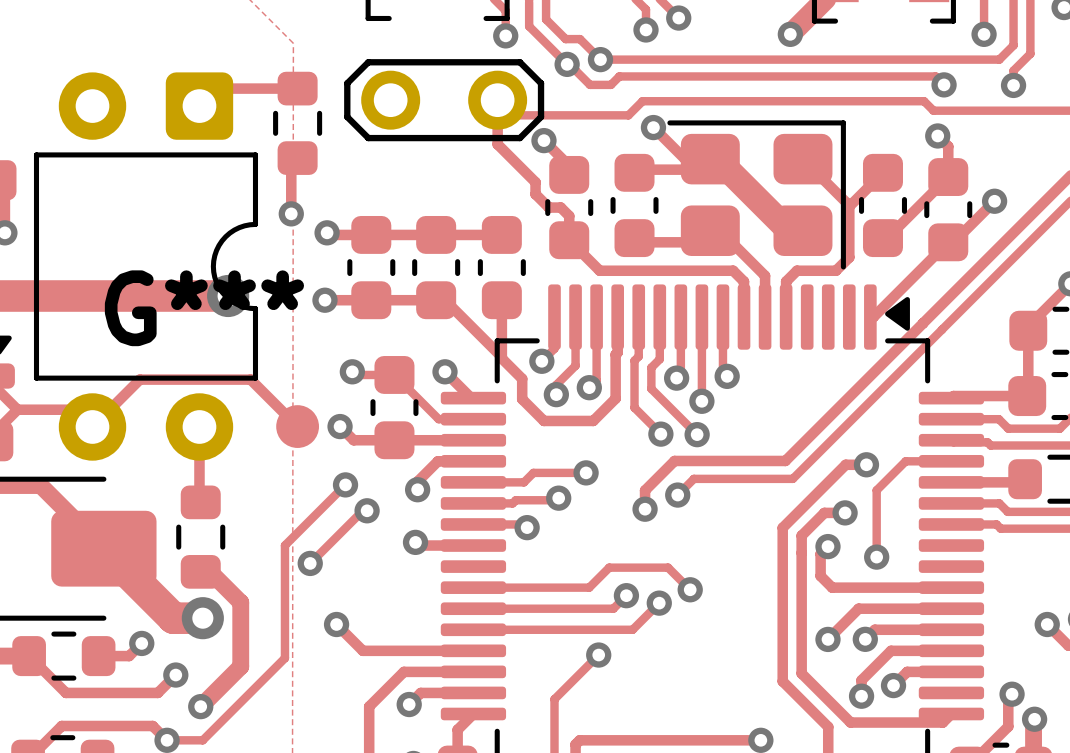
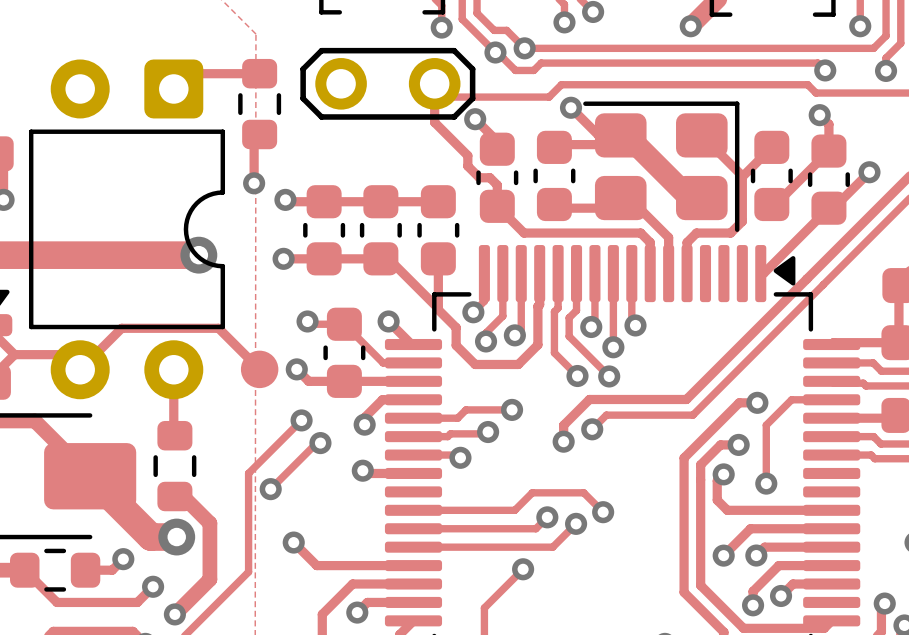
G***: (204, 308) -> none

